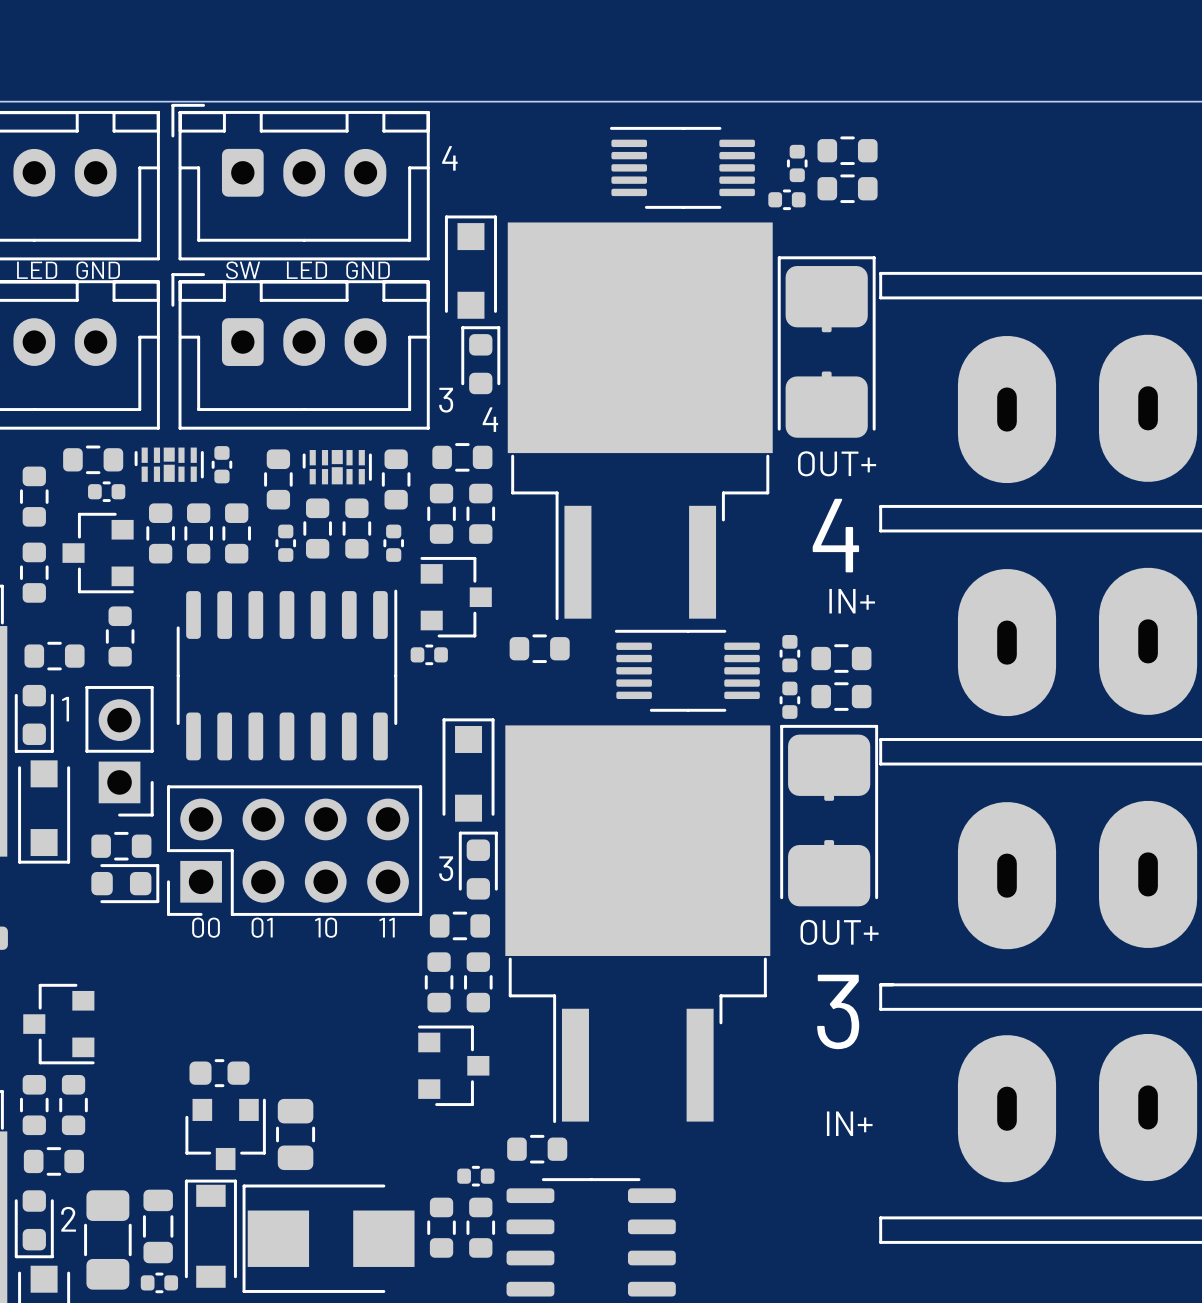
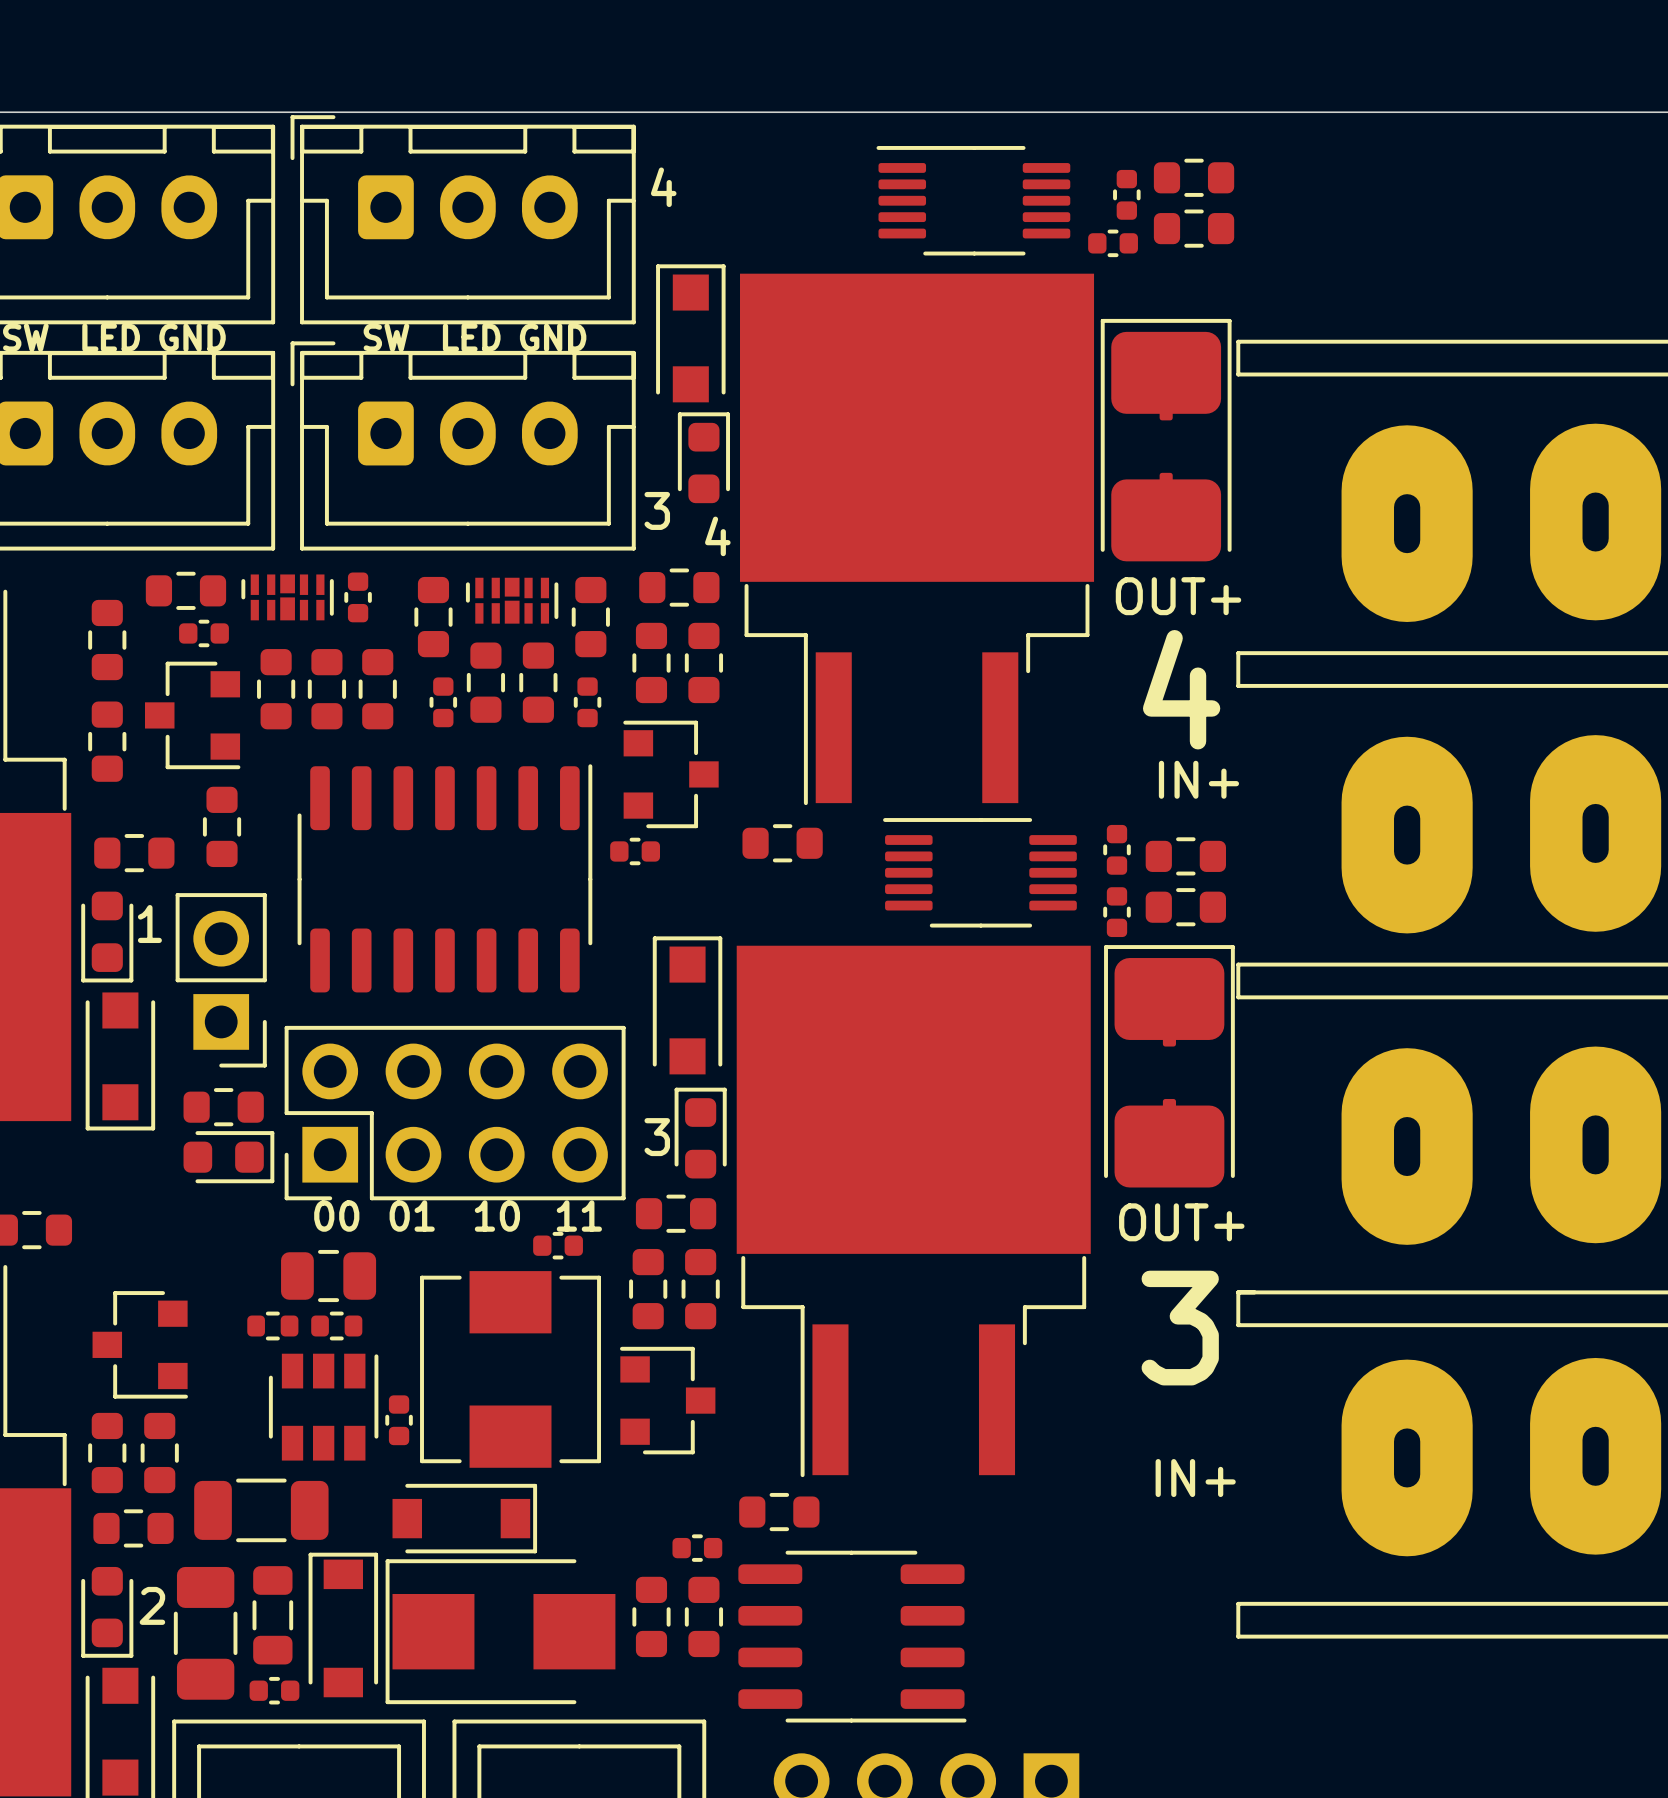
part: none -> (558, 1245)
part: none -> (328, 1276)
part: none -> (272, 1326)
part: none -> (336, 1326)
part: none -> (510, 1369)
part: none -> (323, 1407)
part: (219, 1073) -> none
part: none -> (399, 1420)
part footprint: [276, 1098, 316, 1171] -> [392, 1483, 538, 1554]
part: (225, 1134) -> none
part: none -> (261, 1510)

